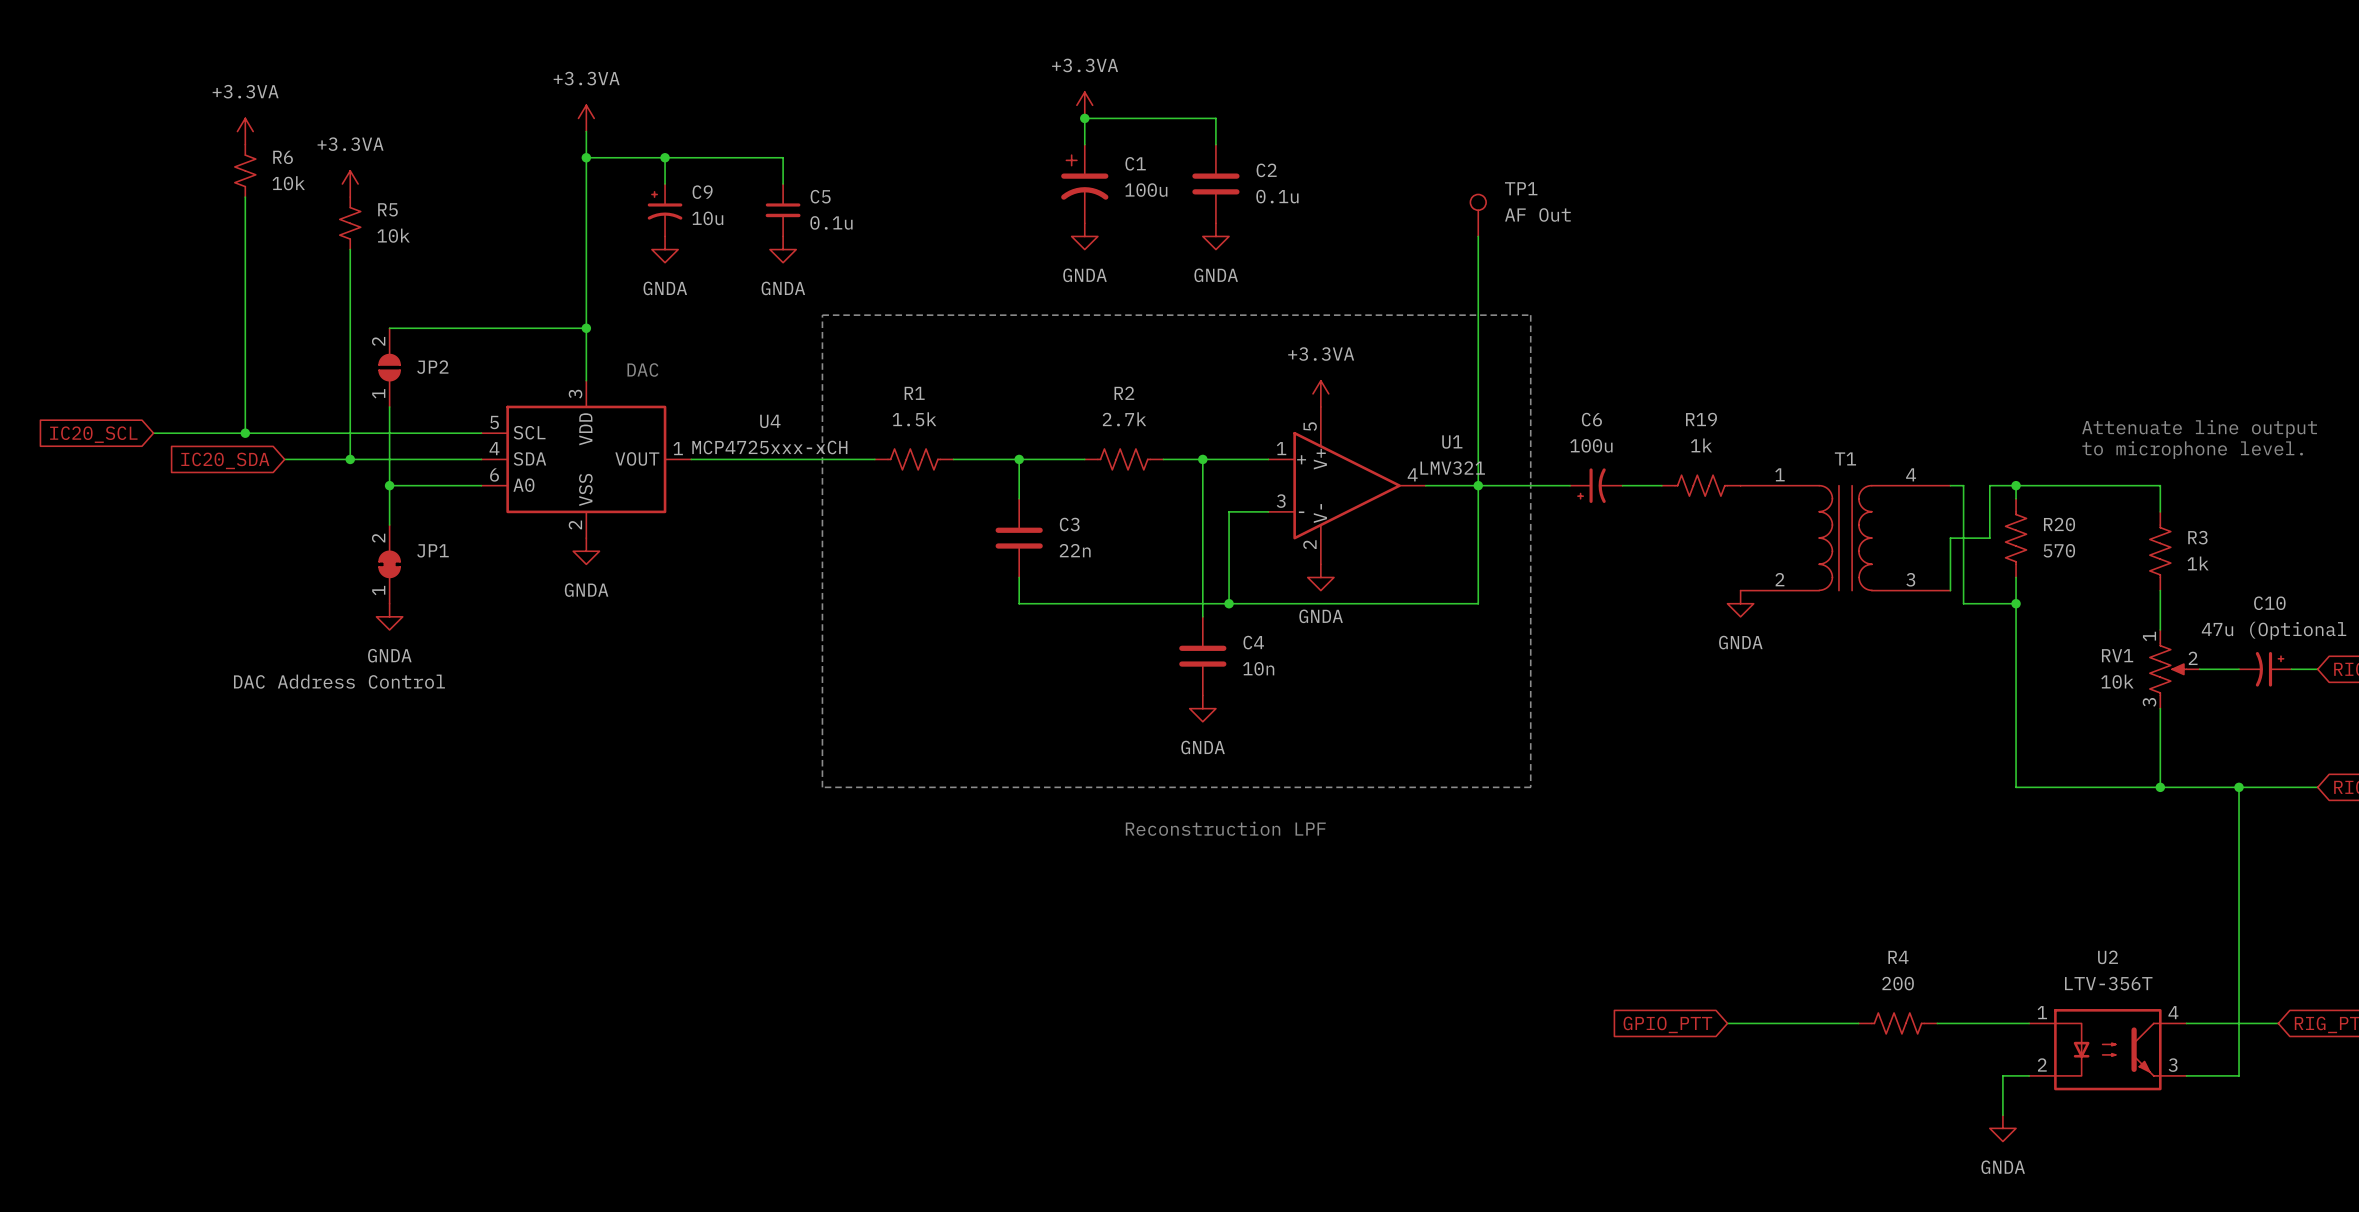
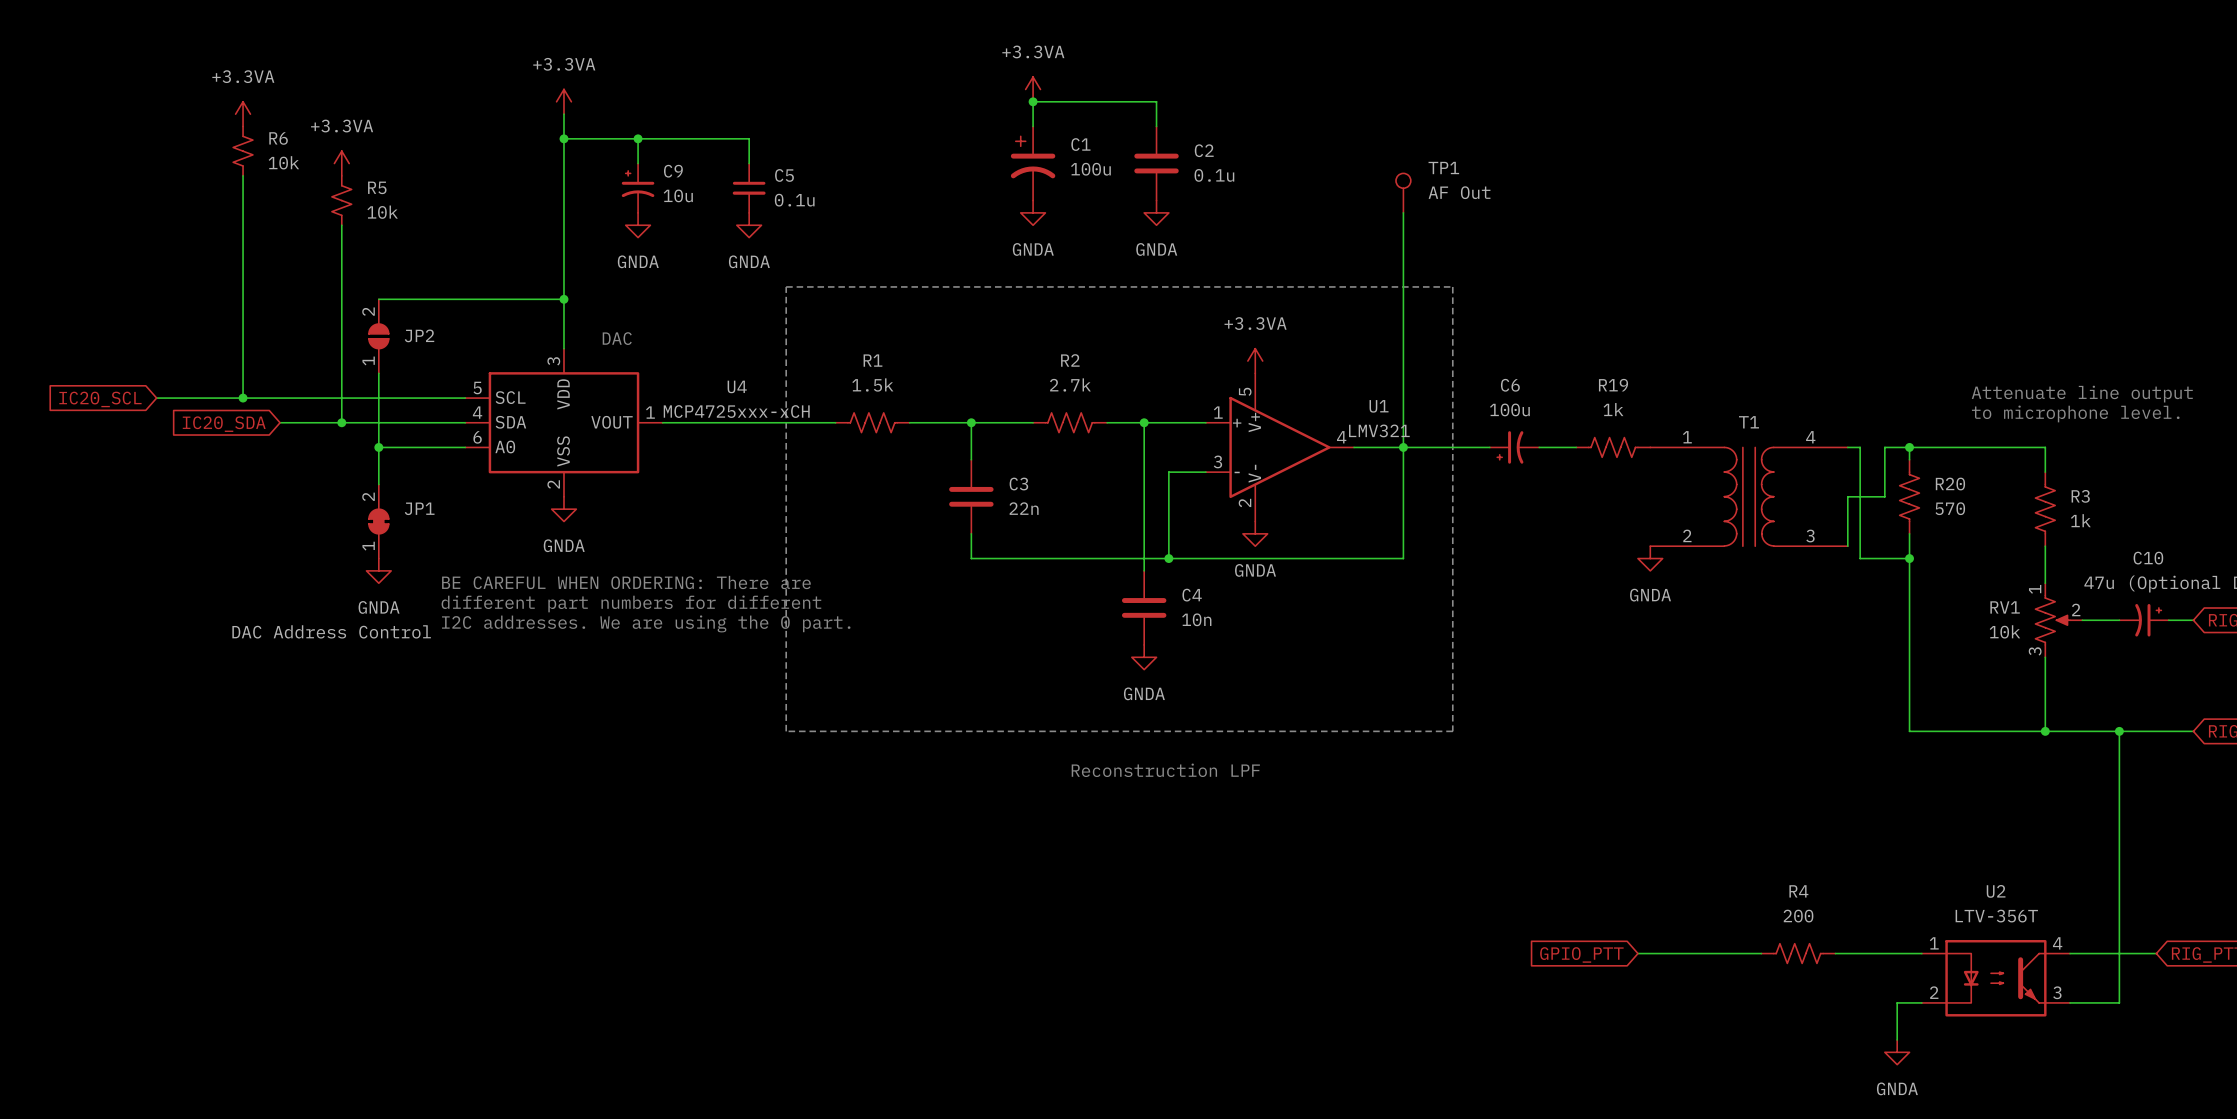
text: none -> BE CAREFUL WHEN ORDERING: There are (626, 582)
text: none -> different part numbers for different (631, 603)
text: none -> I2C addresses. We are using the 0 part. (646, 623)

